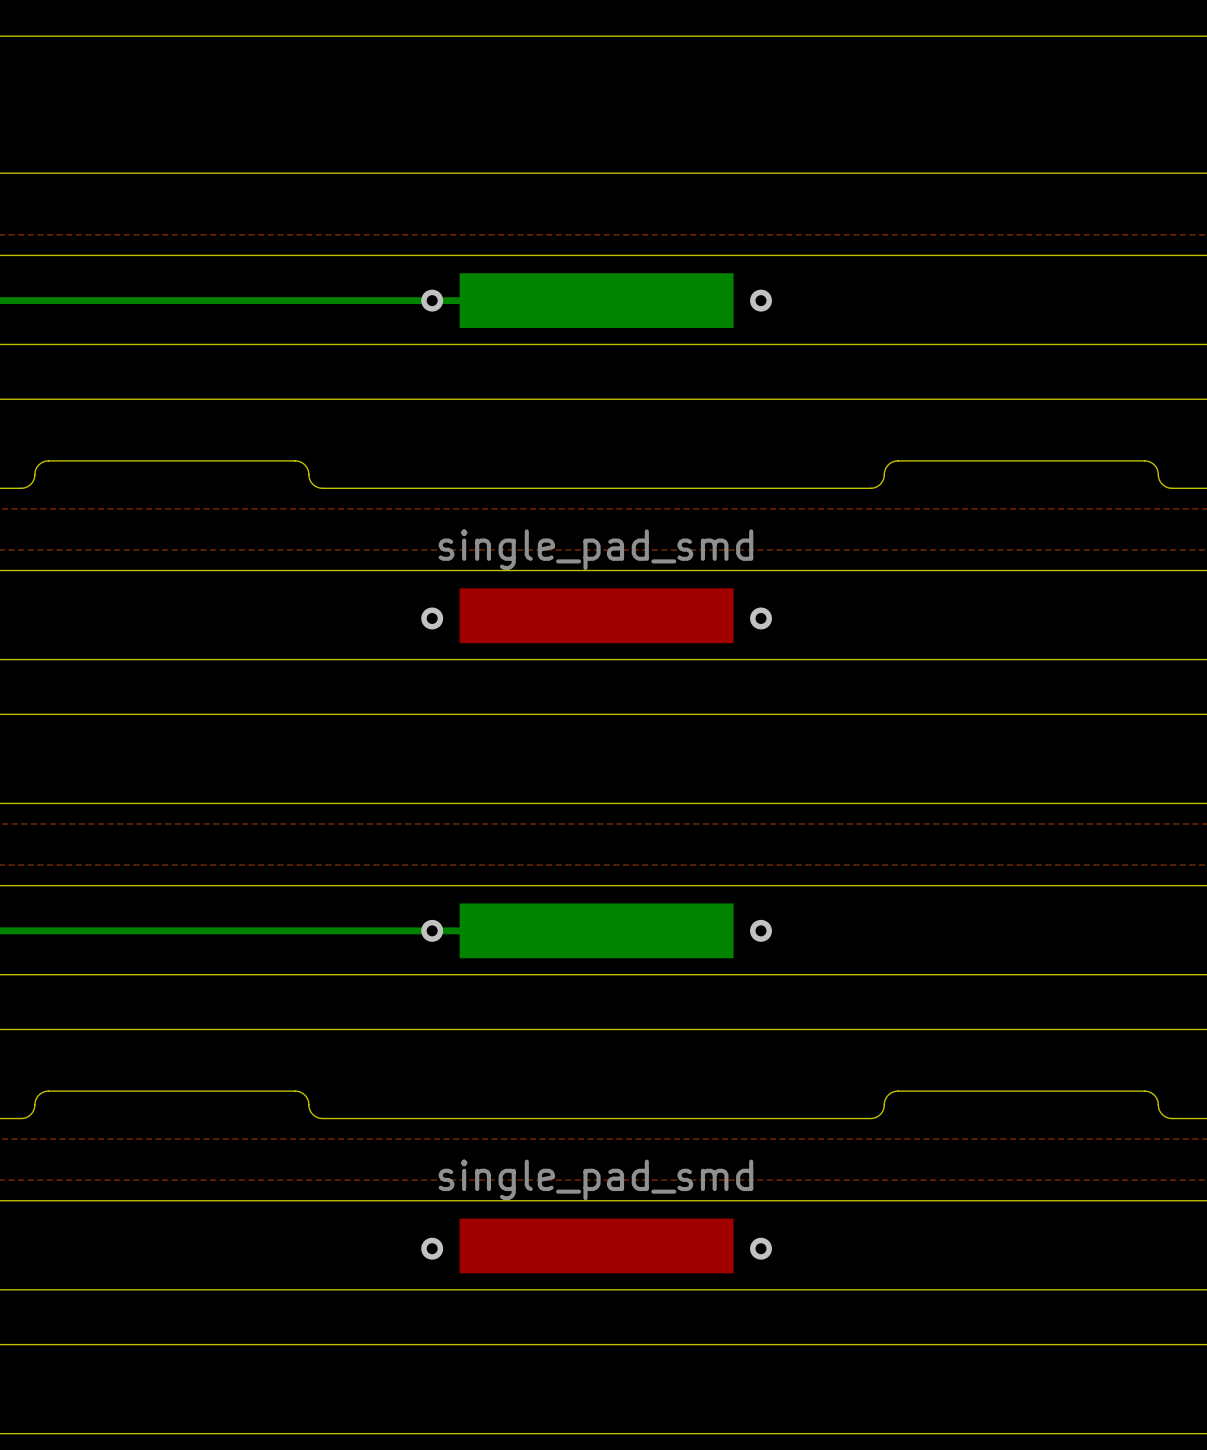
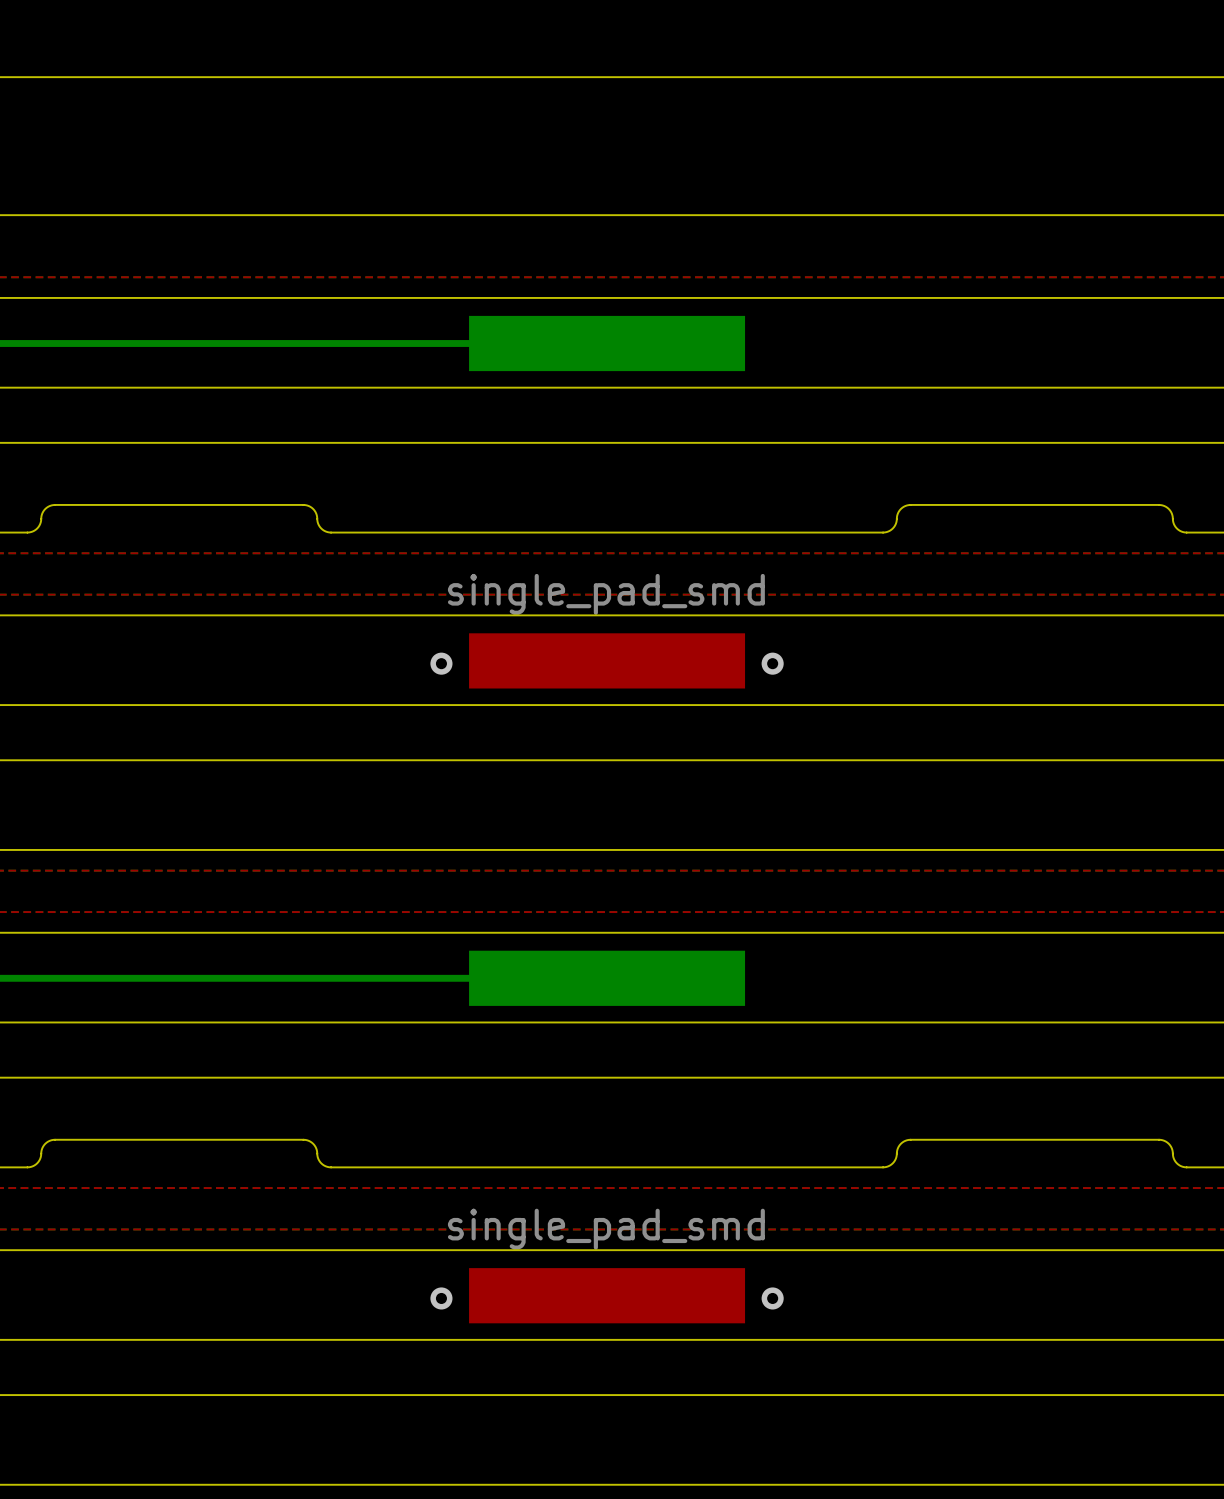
via: (432, 300) -> none
via: (761, 300) -> none
via: (432, 930) -> none
via: (761, 930) -> none

